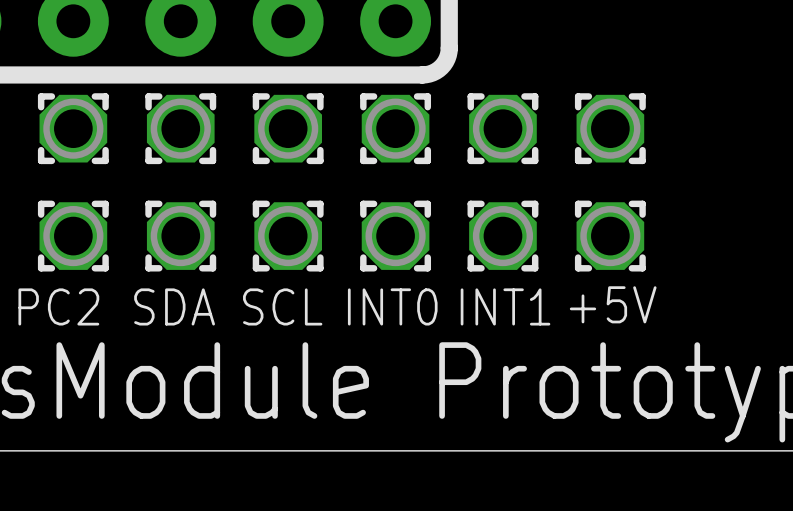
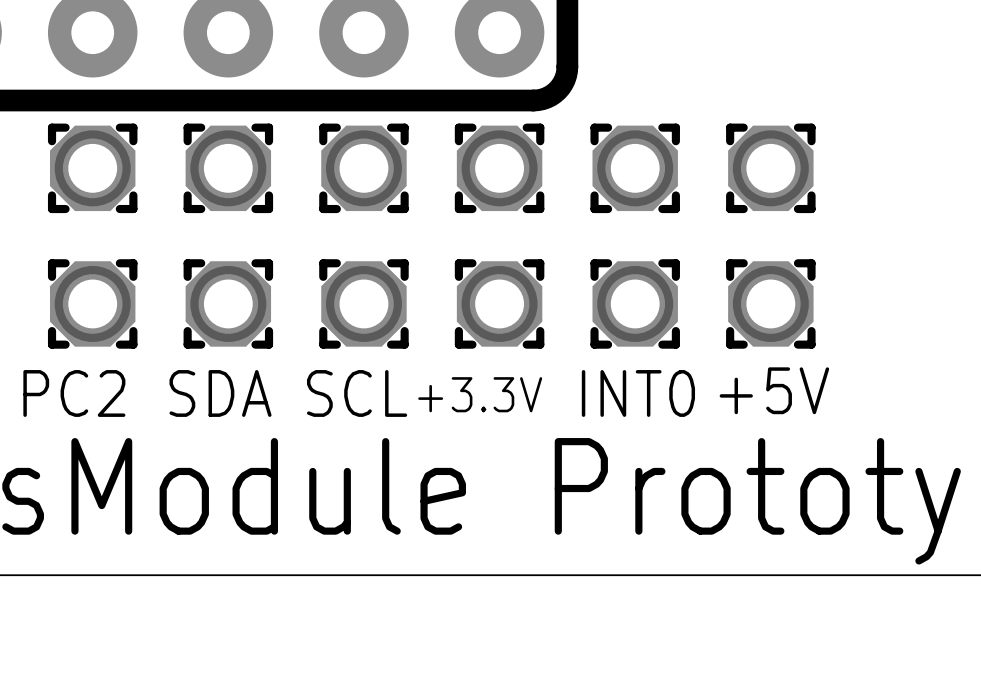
text: INT0 (392, 306) -> +3.3V (480, 394)
text: INT1 (505, 306) -> INT0 (638, 393)

